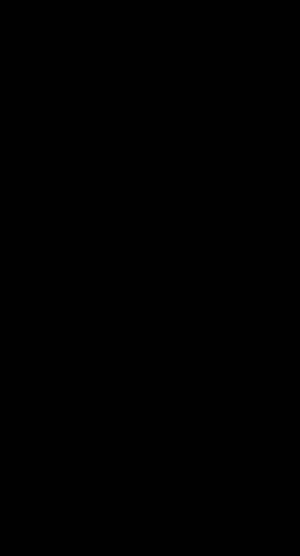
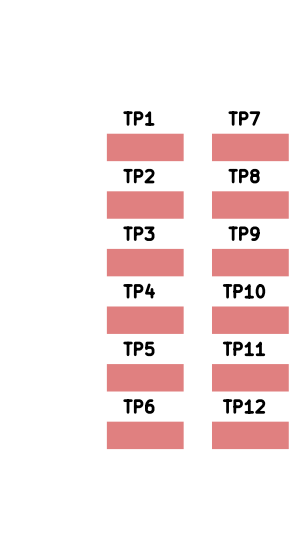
TP1: none -> (145, 147)
TP7: none -> (250, 147)
TP2: none -> (145, 205)
TP8: none -> (250, 205)
TP3: none -> (145, 262)
TP9: none -> (250, 262)
TP4: none -> (145, 320)
TP10: none -> (250, 320)
TP5: none -> (145, 377)
TP11: none -> (250, 377)
TP6: none -> (145, 435)
TP12: none -> (250, 435)

